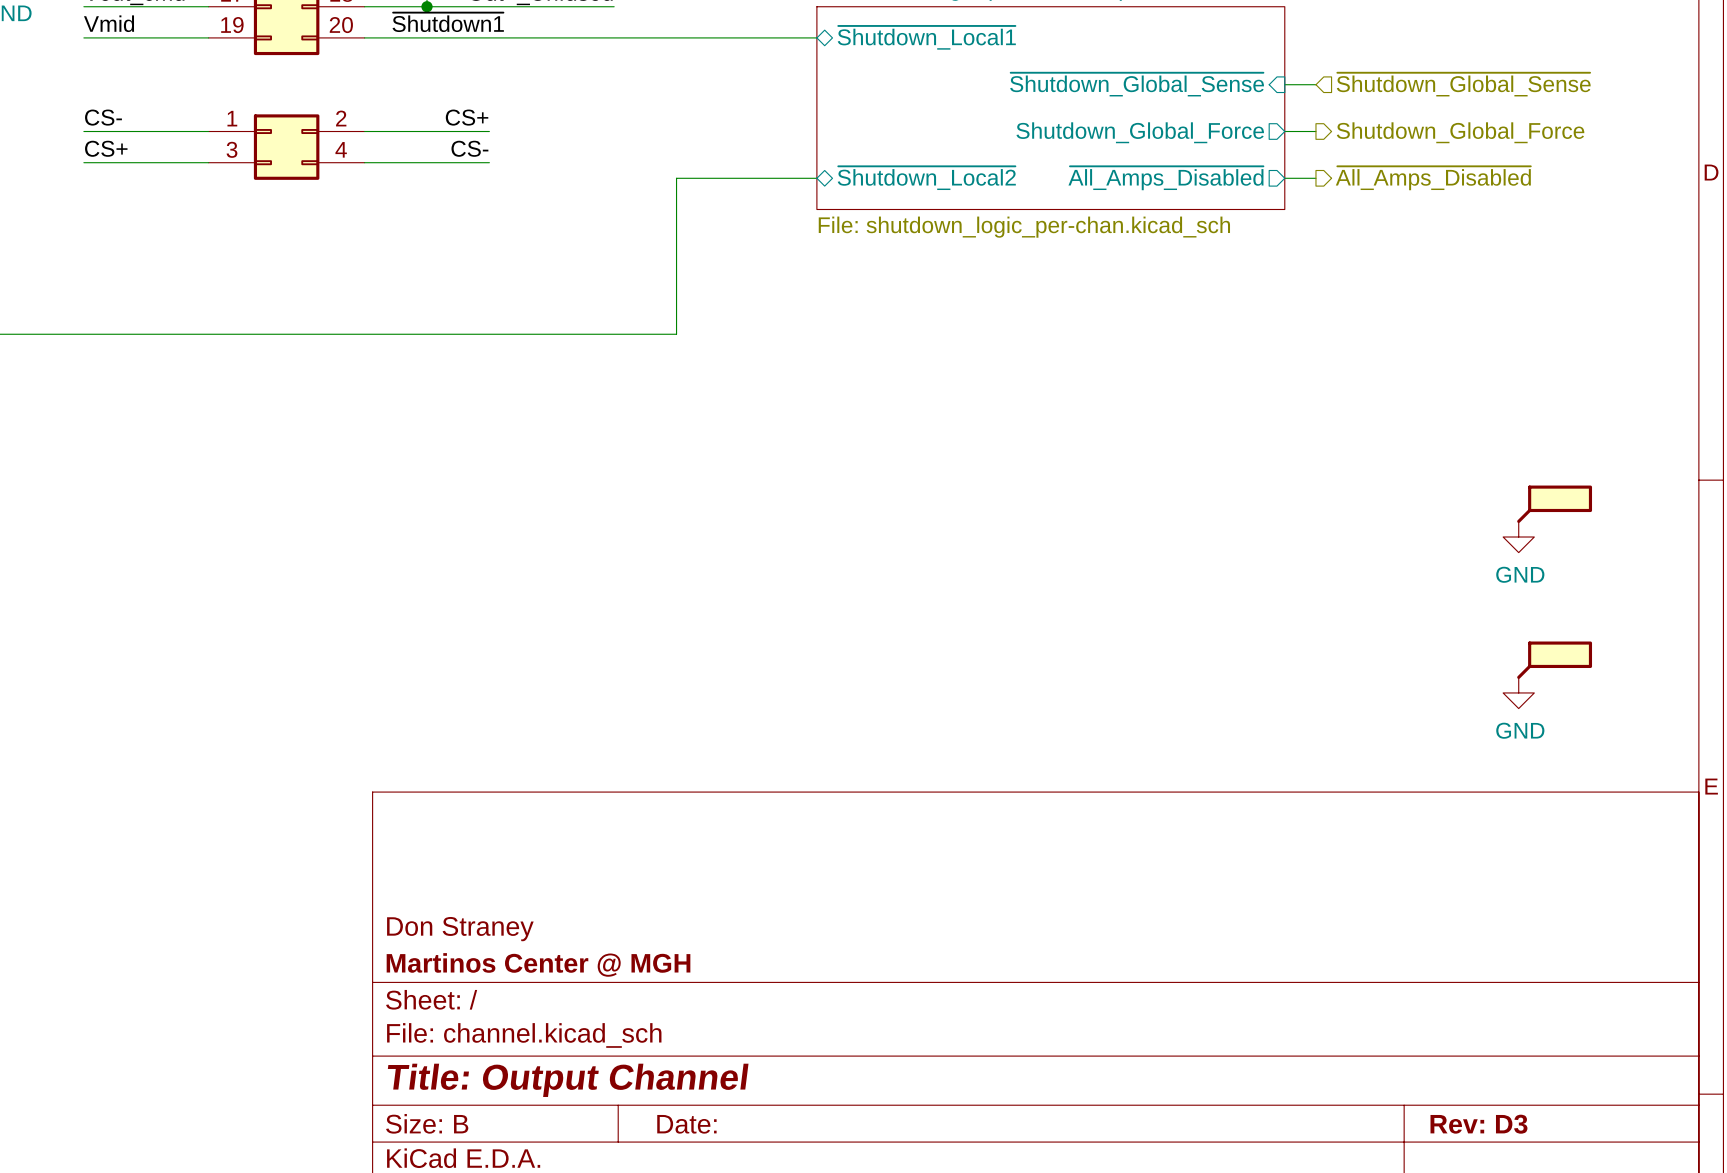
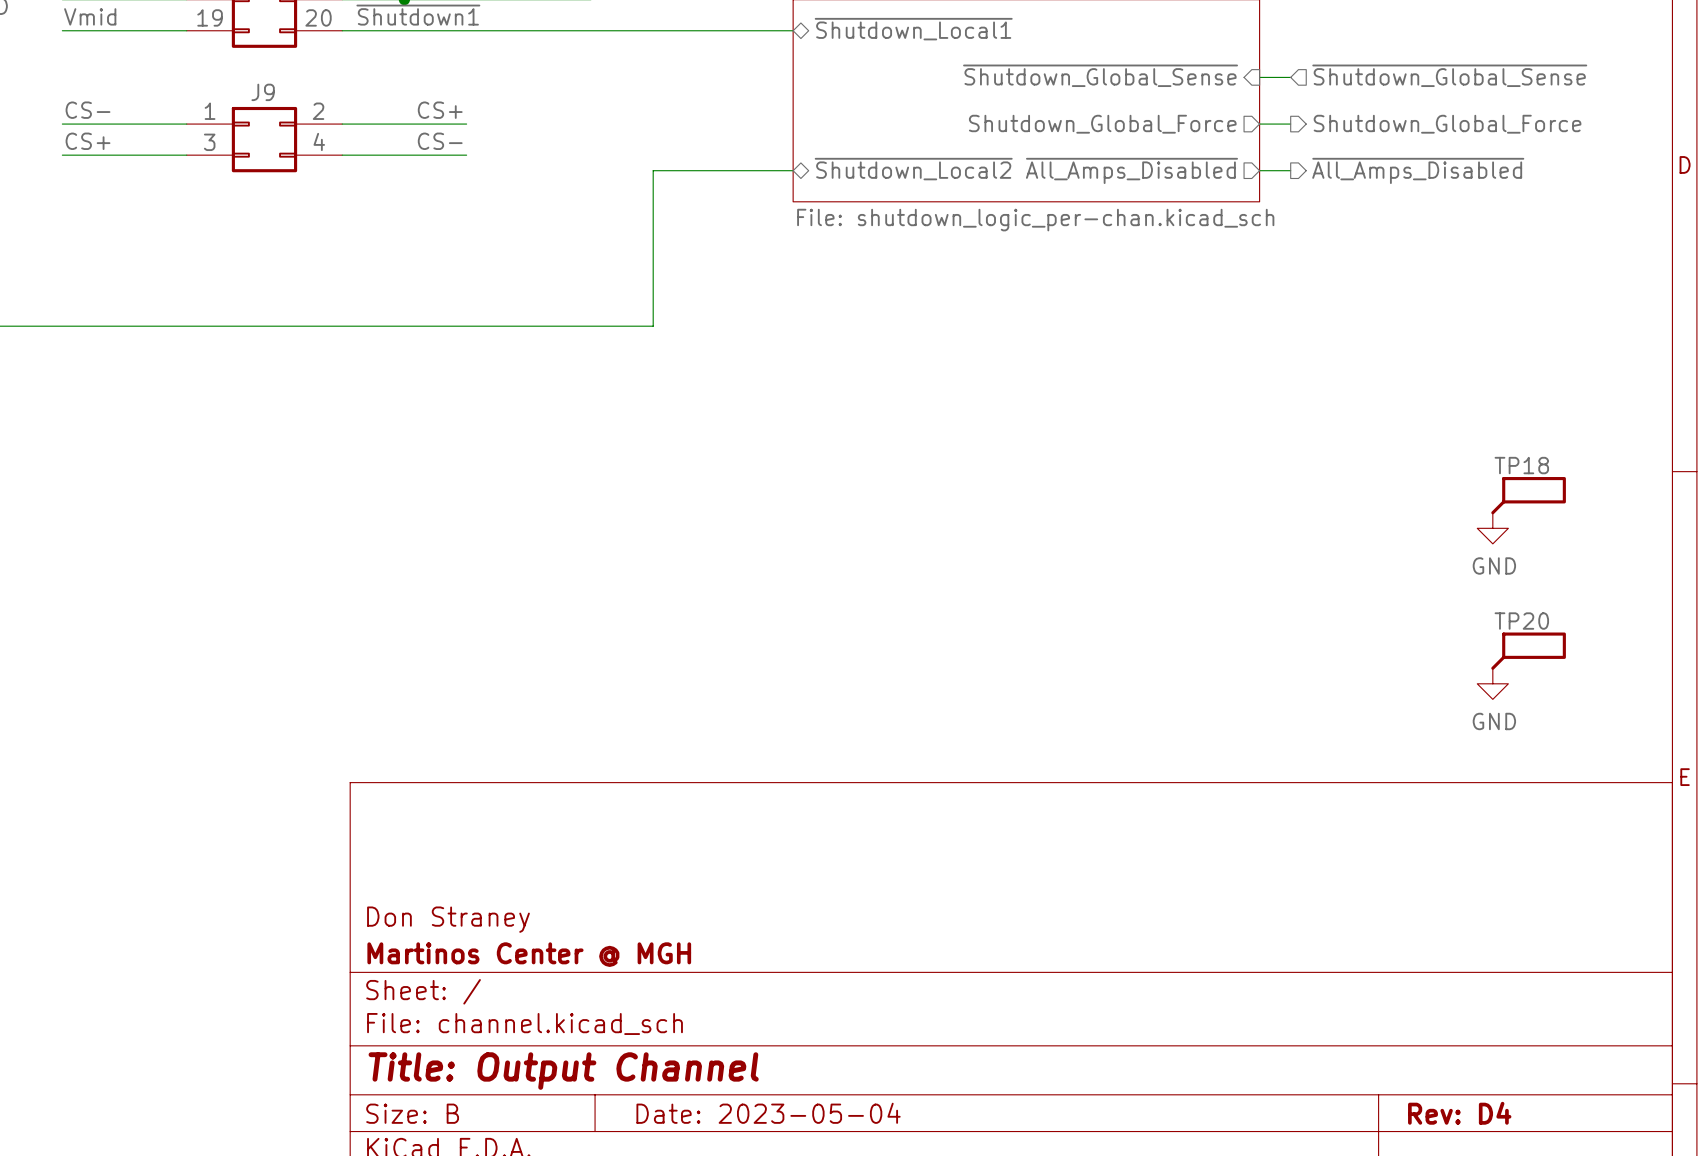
J9 name: none -> J9 (263, 92)
TP18 name: none -> TP18 (1521, 465)
TP20 name: none -> TP20 (1521, 621)
title block: Date: (686, 1124) -> Date: 2023-05-04 (768, 1113)
title block: Rev: D3 (1478, 1124) -> Rev: D4 (1459, 1113)

